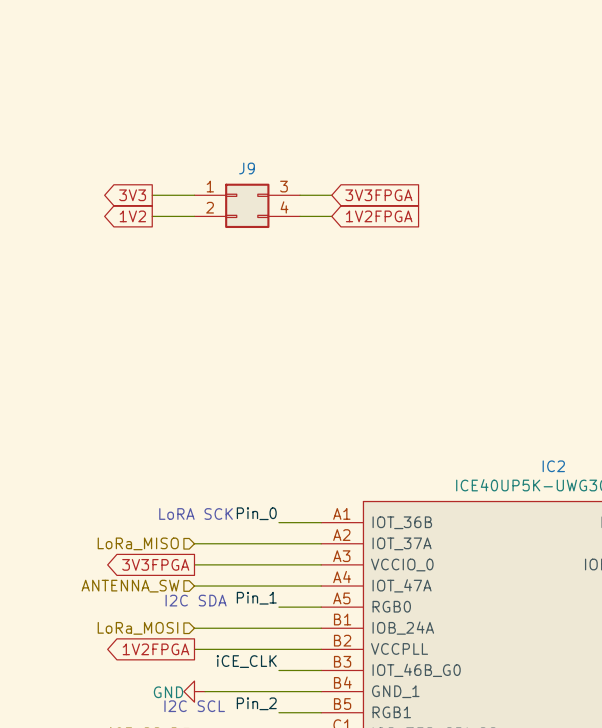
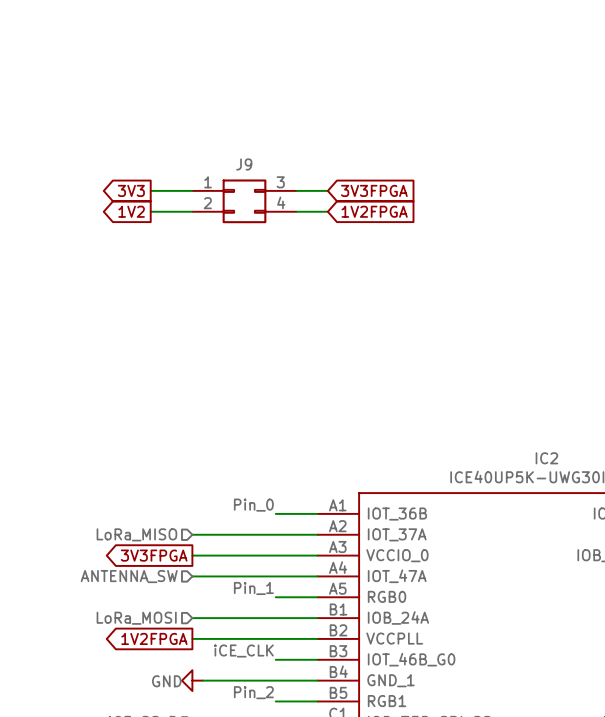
text: LoRA SCK (196, 513) -> none
text: I2C SDA (196, 600) -> none
text: I2C SCL (194, 706) -> none

